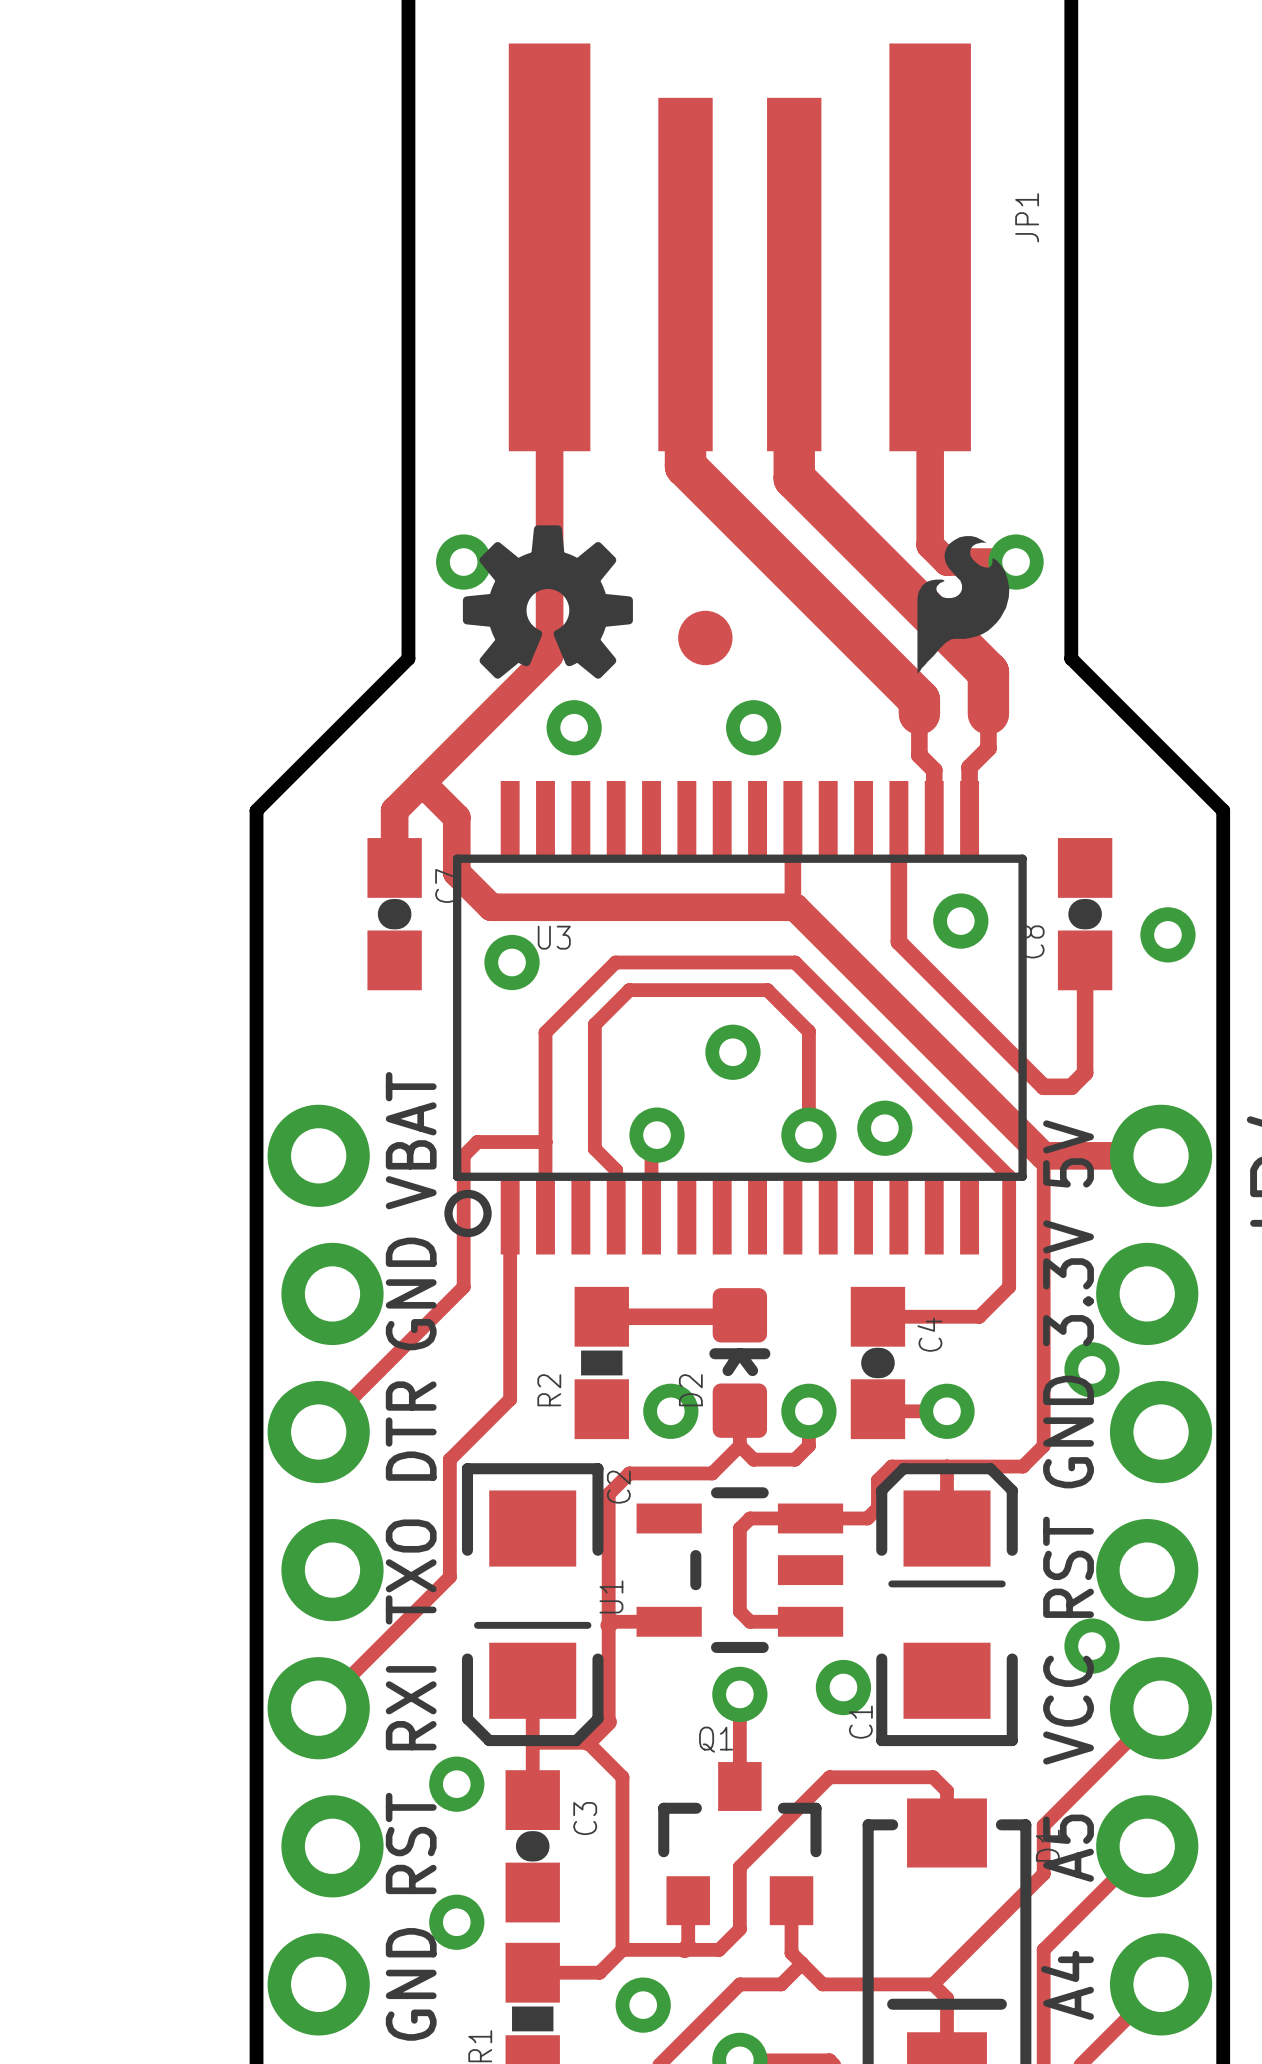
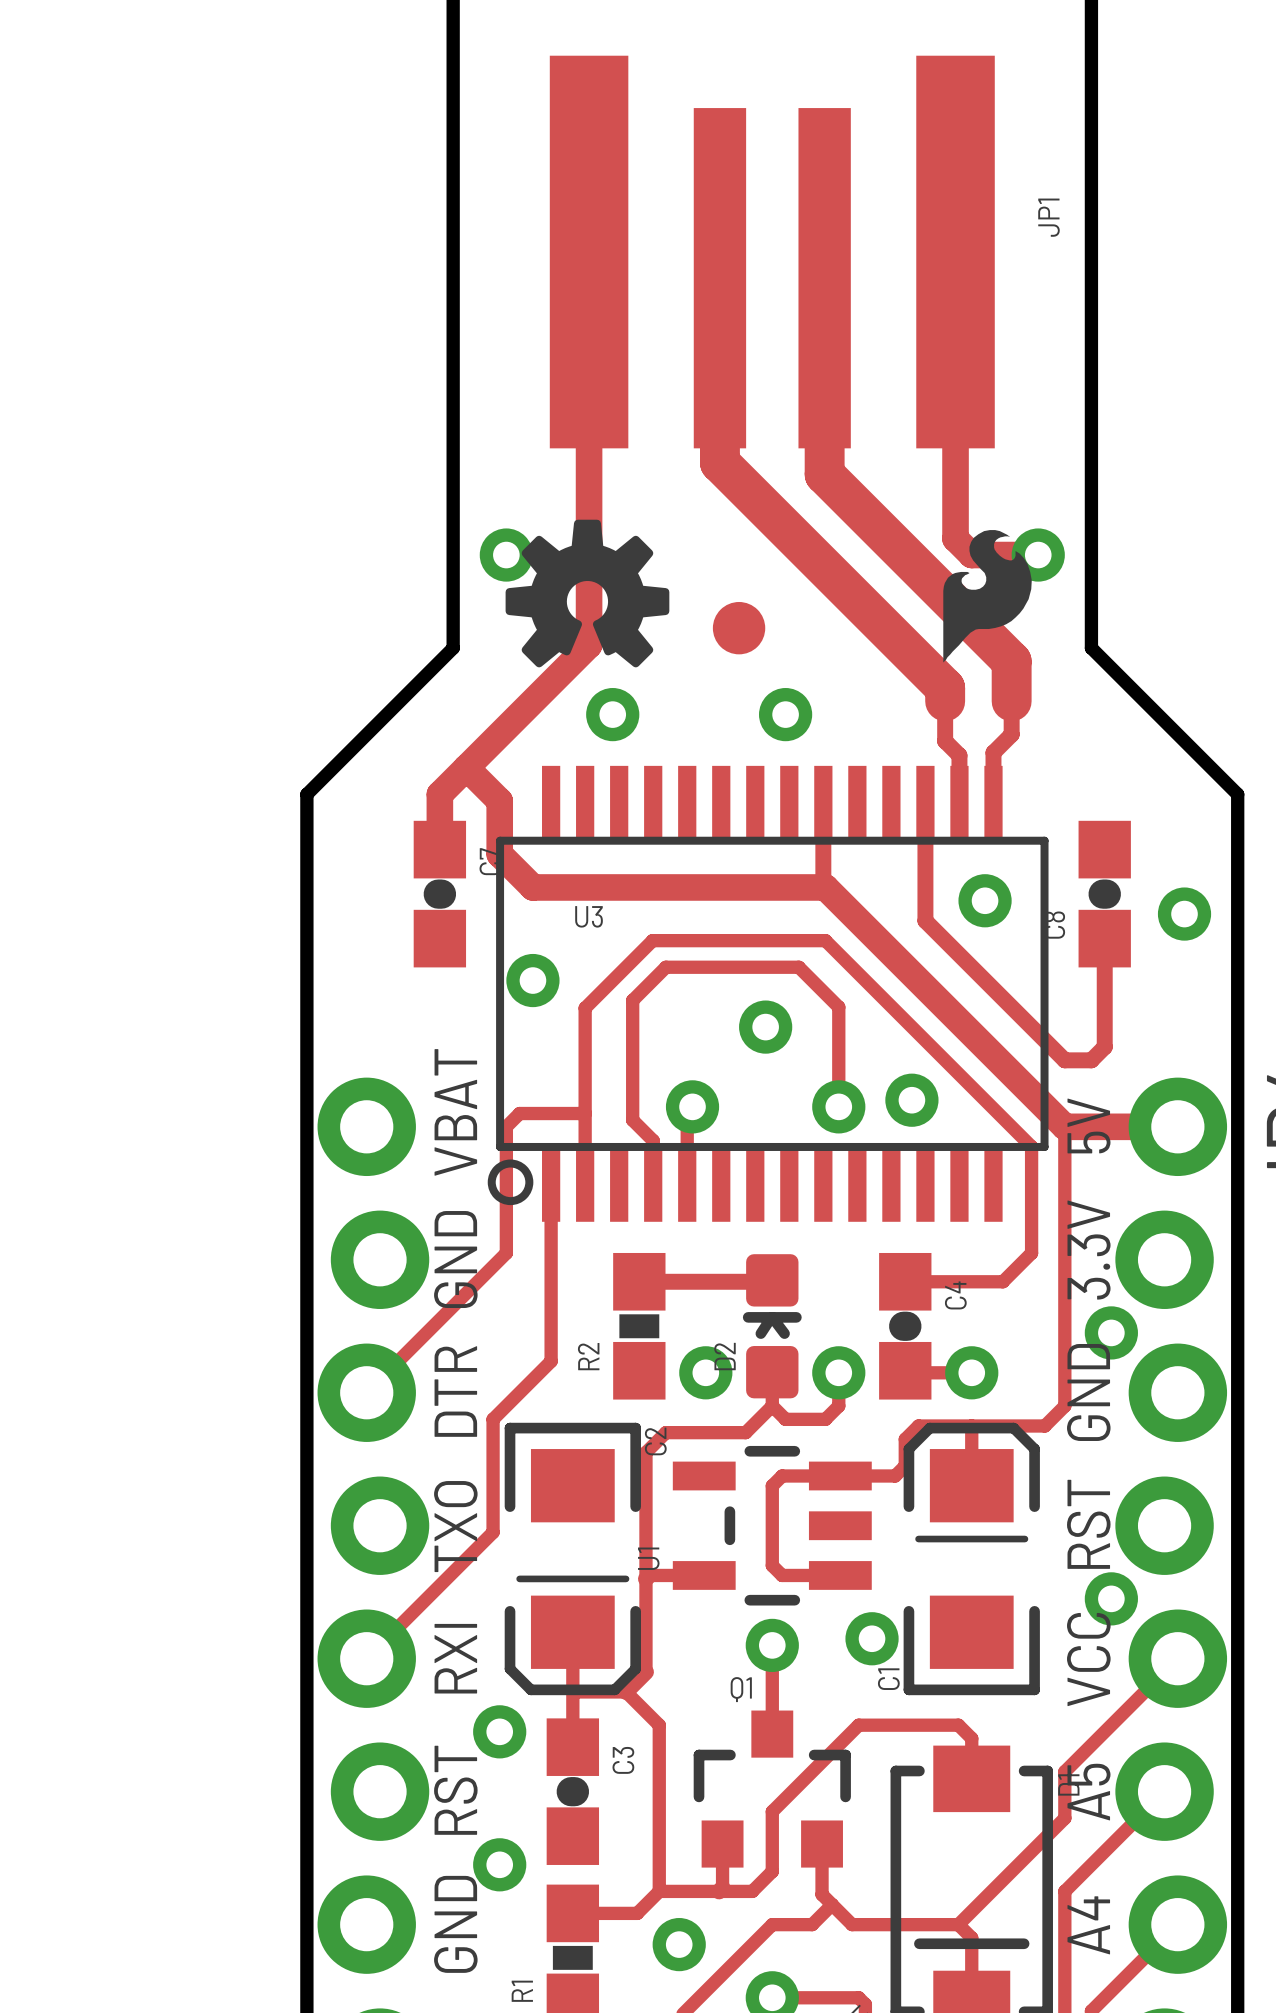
via position: (512, 962) -> (532, 980)

